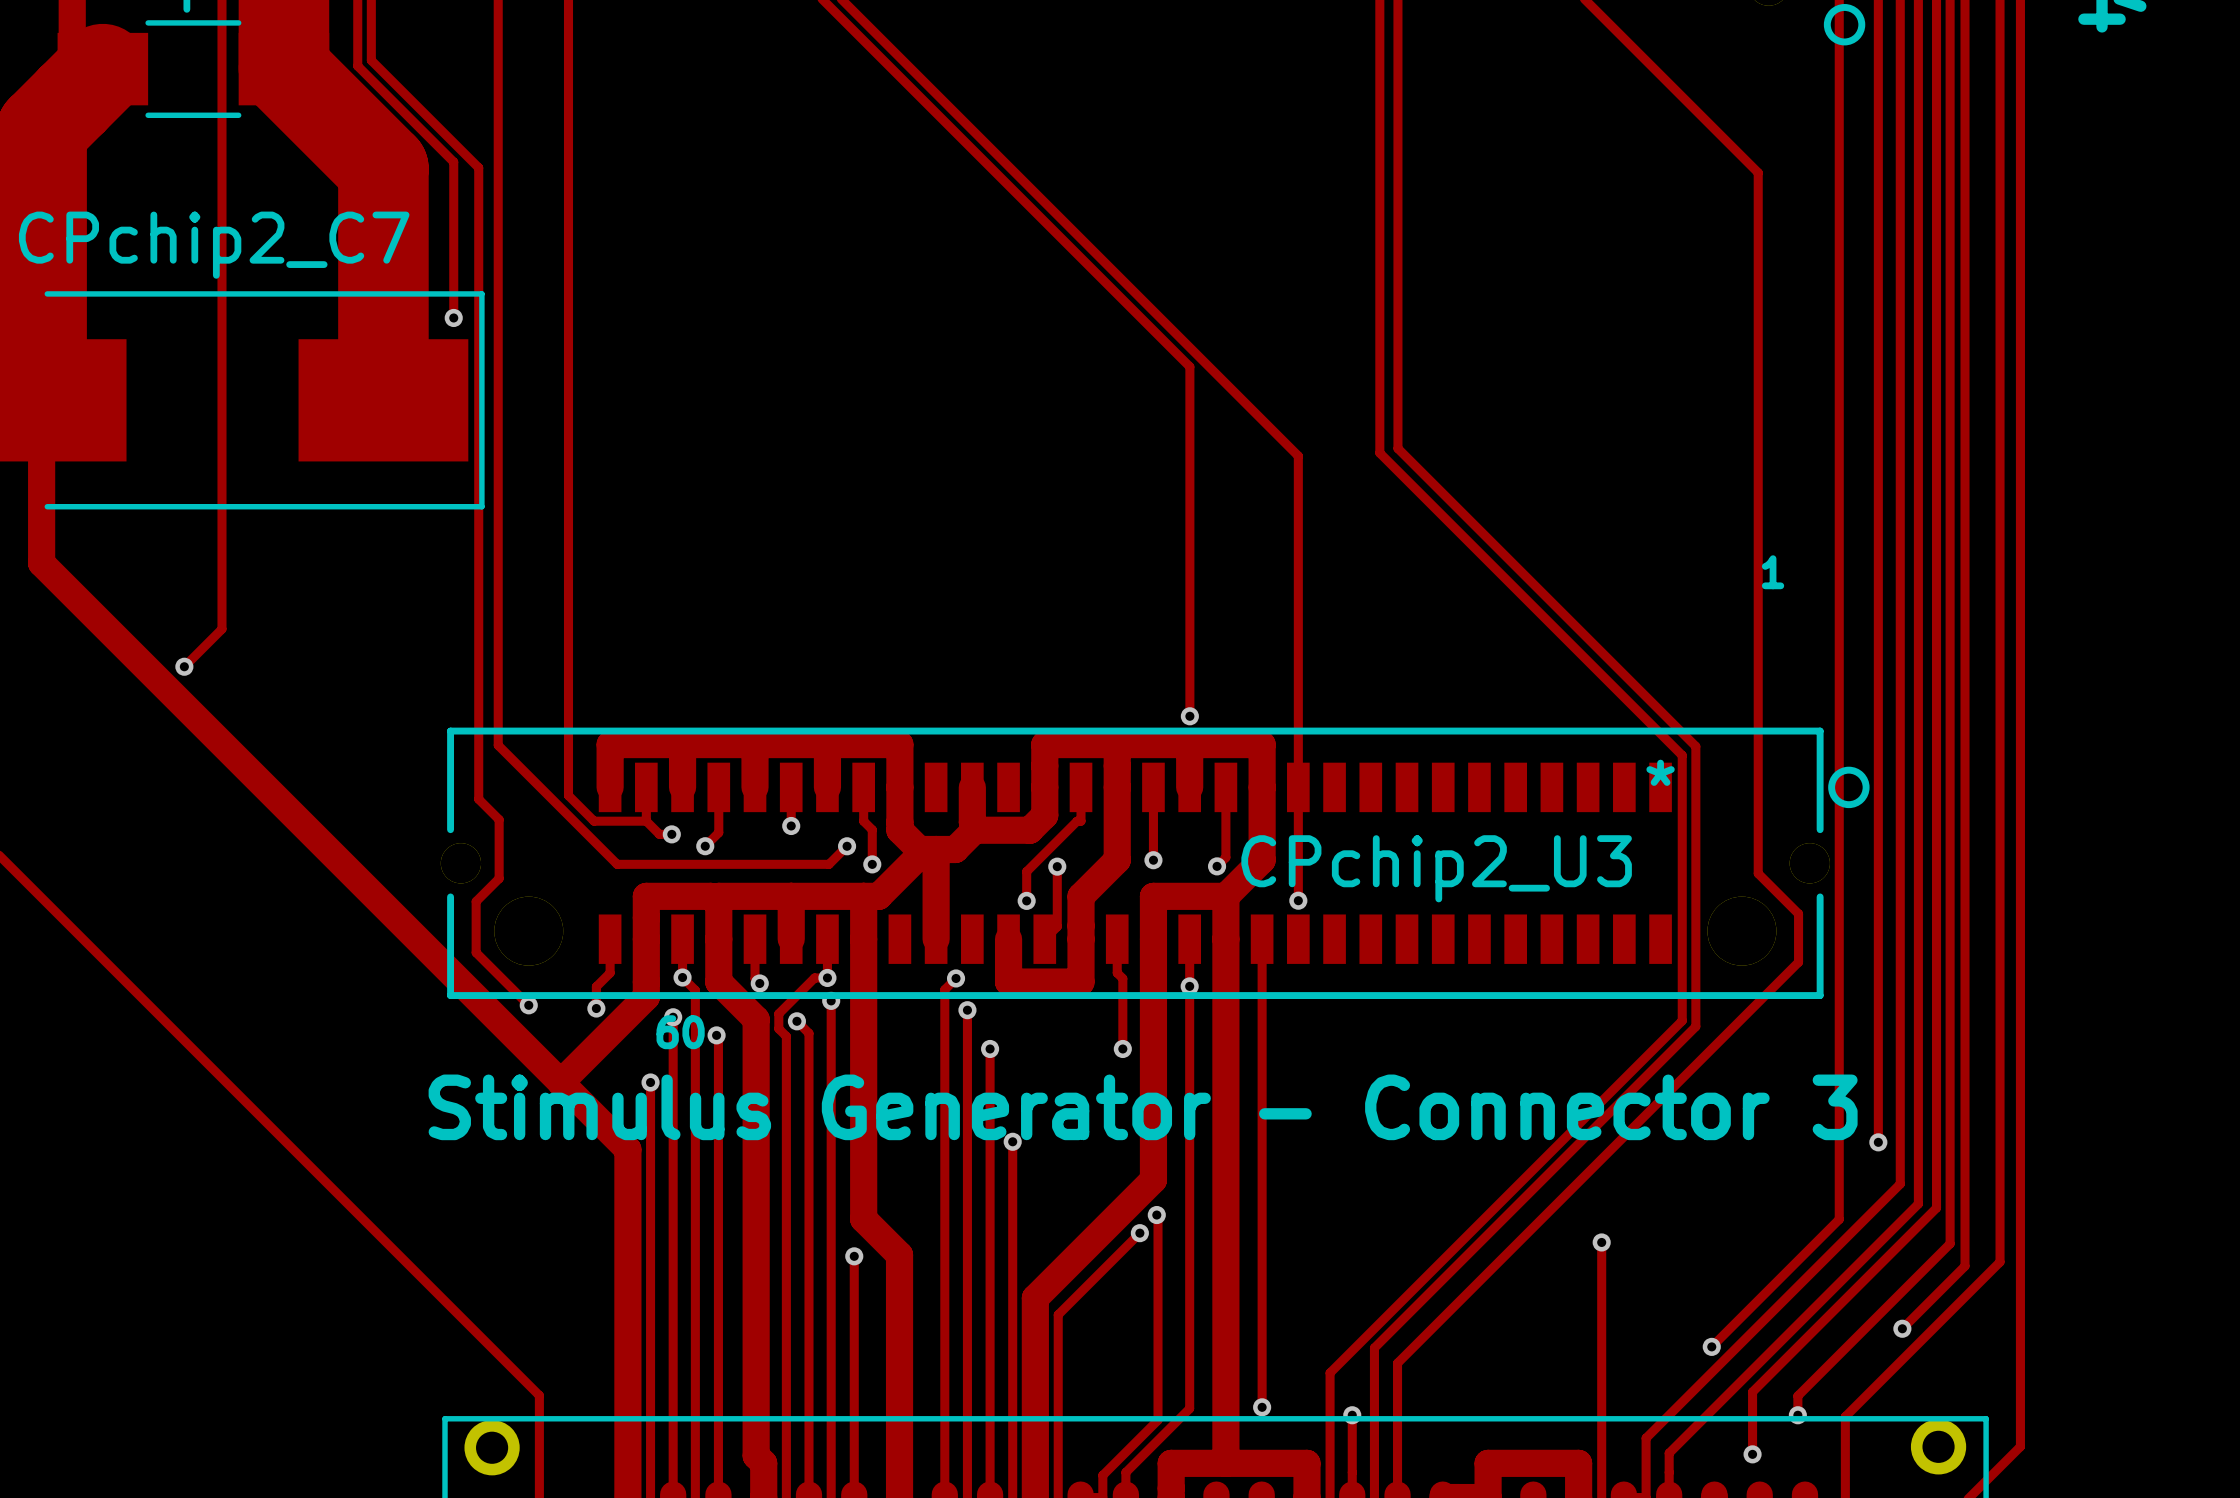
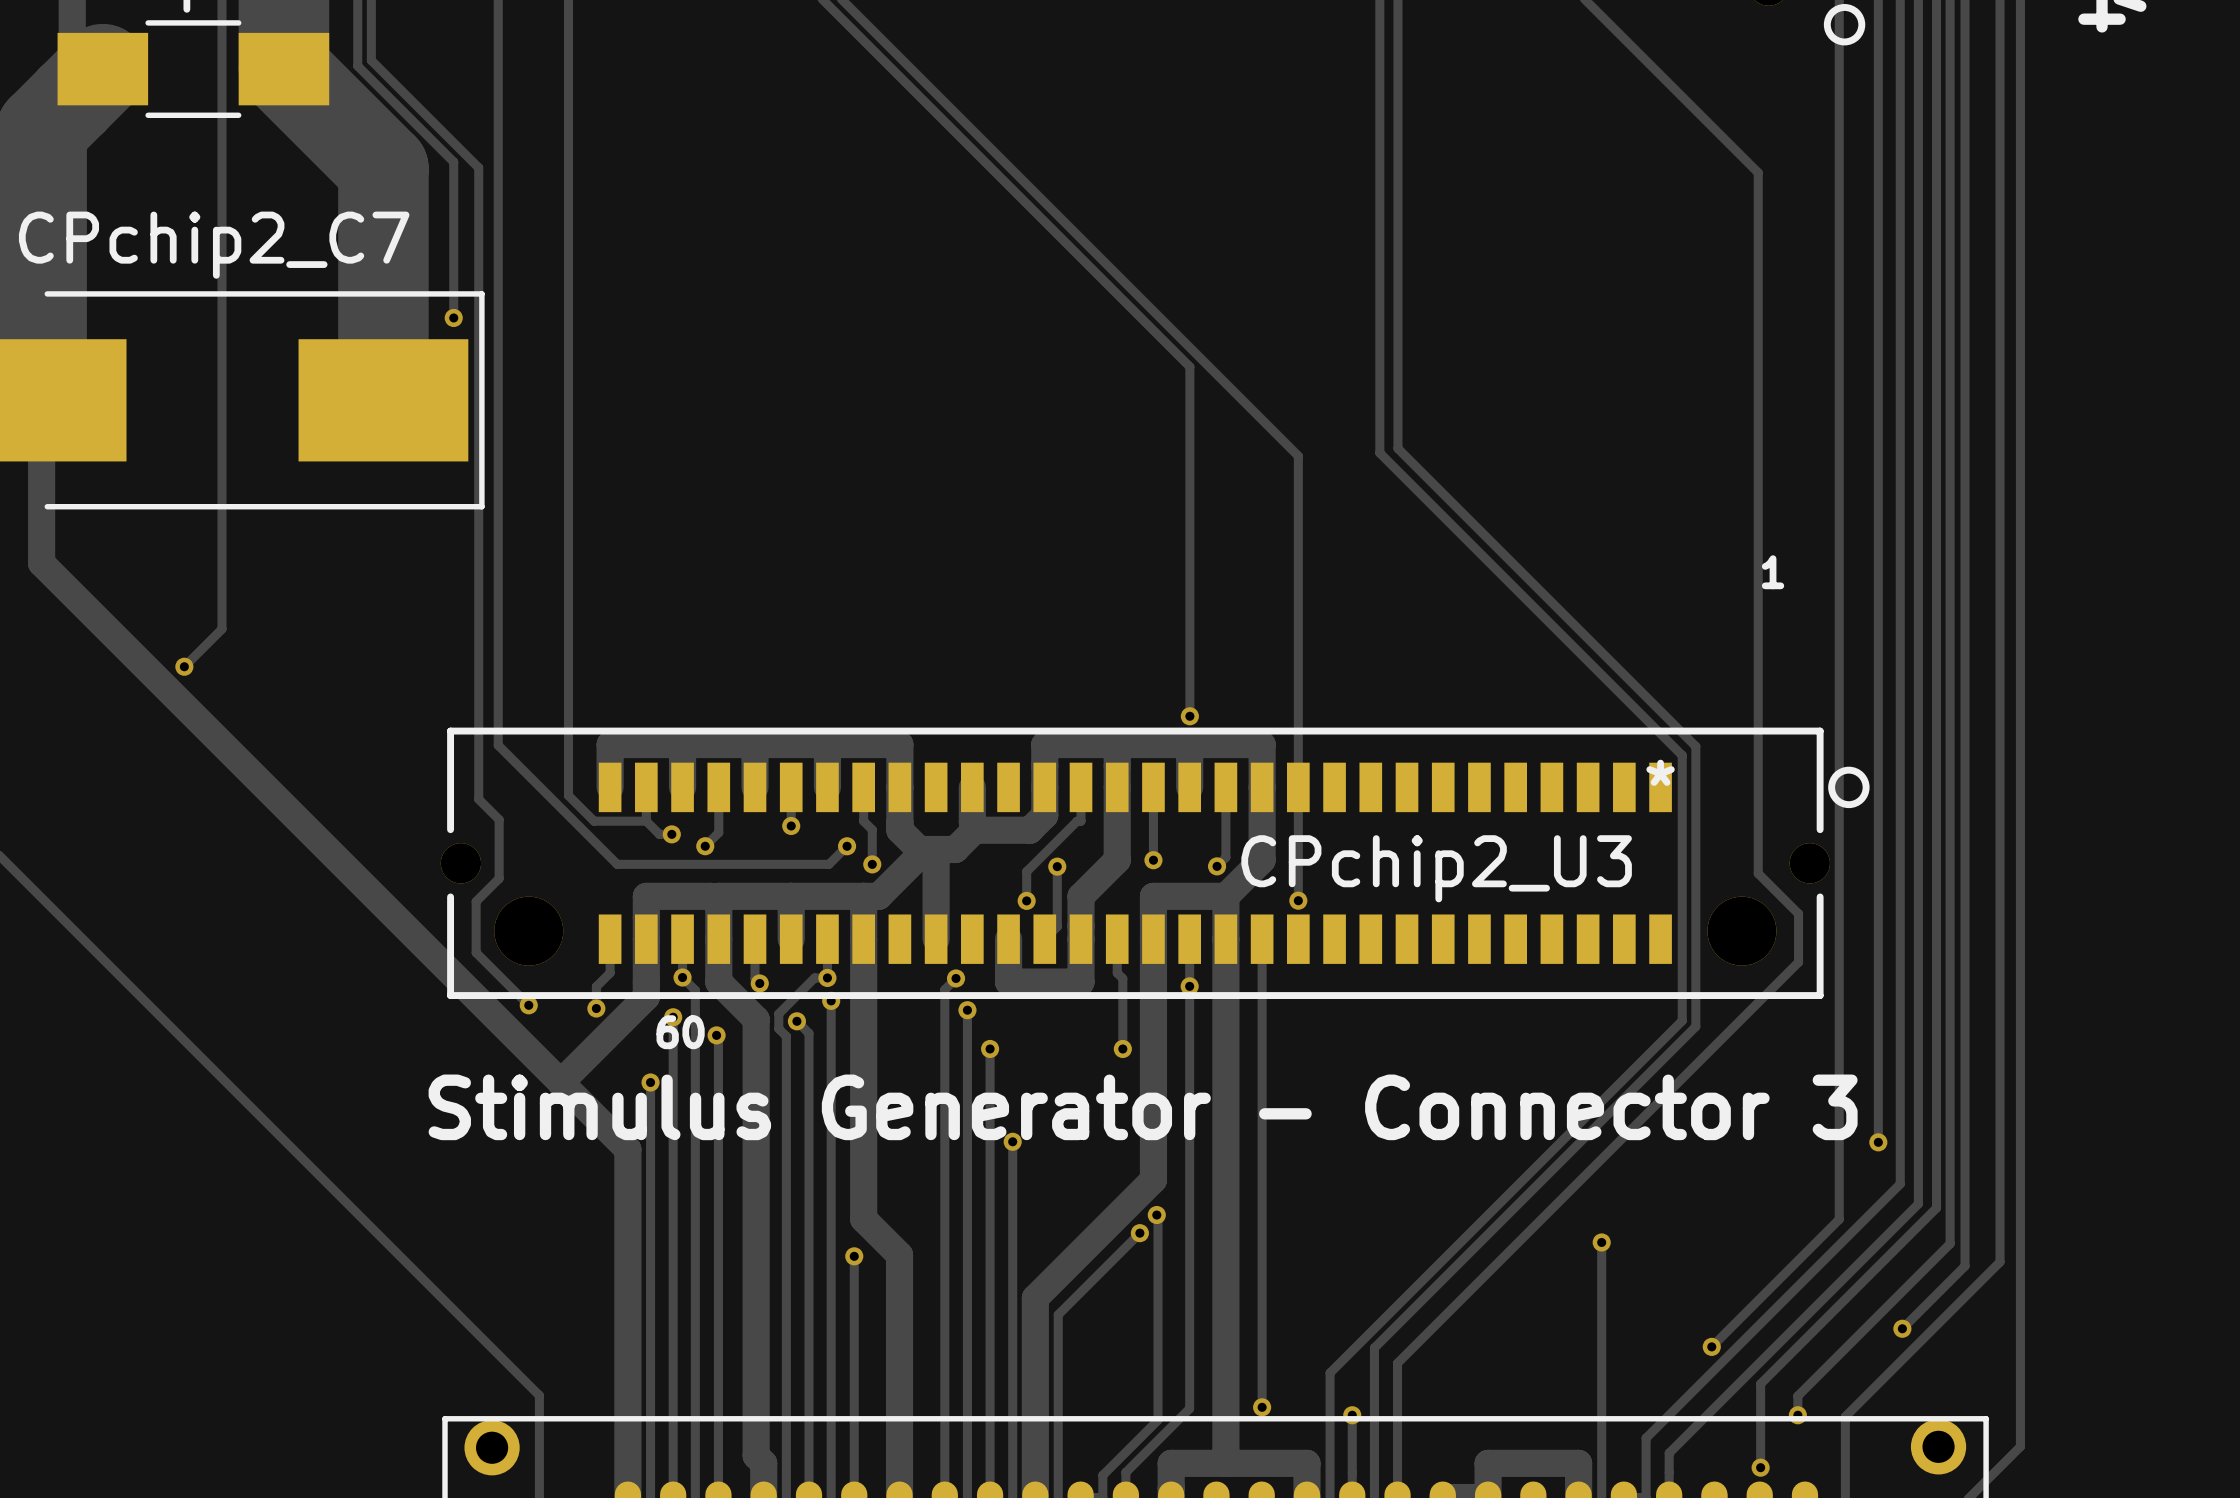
track: (1760, 1383) (1752, 1391) (1752, 1454) -> (1760, 1383) (1760, 1467)
via position: (1752, 1454) -> (1760, 1467)

